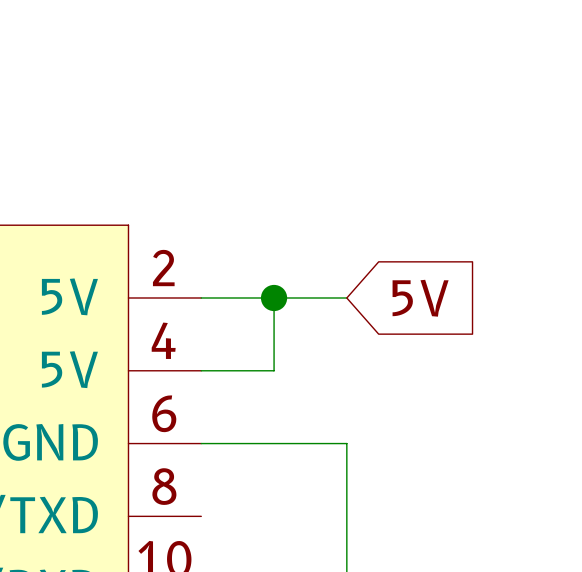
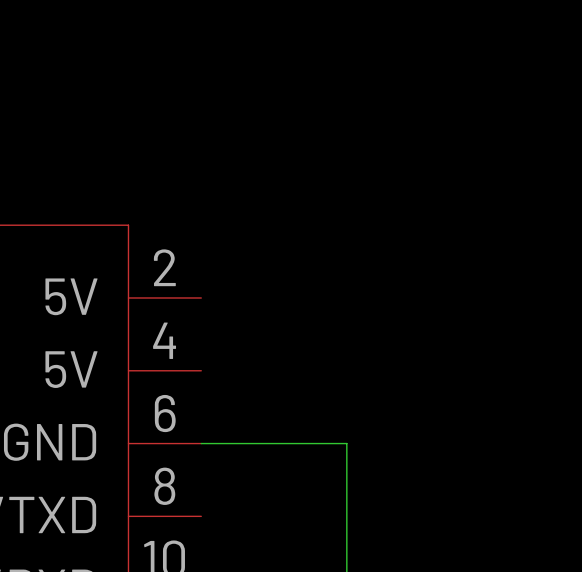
wire: (201, 297) (346, 297) -> none
wire: (274, 297) (274, 370) (201, 370) -> none
junction: (274, 297) -> none
global label: 5V (420, 298) -> none

